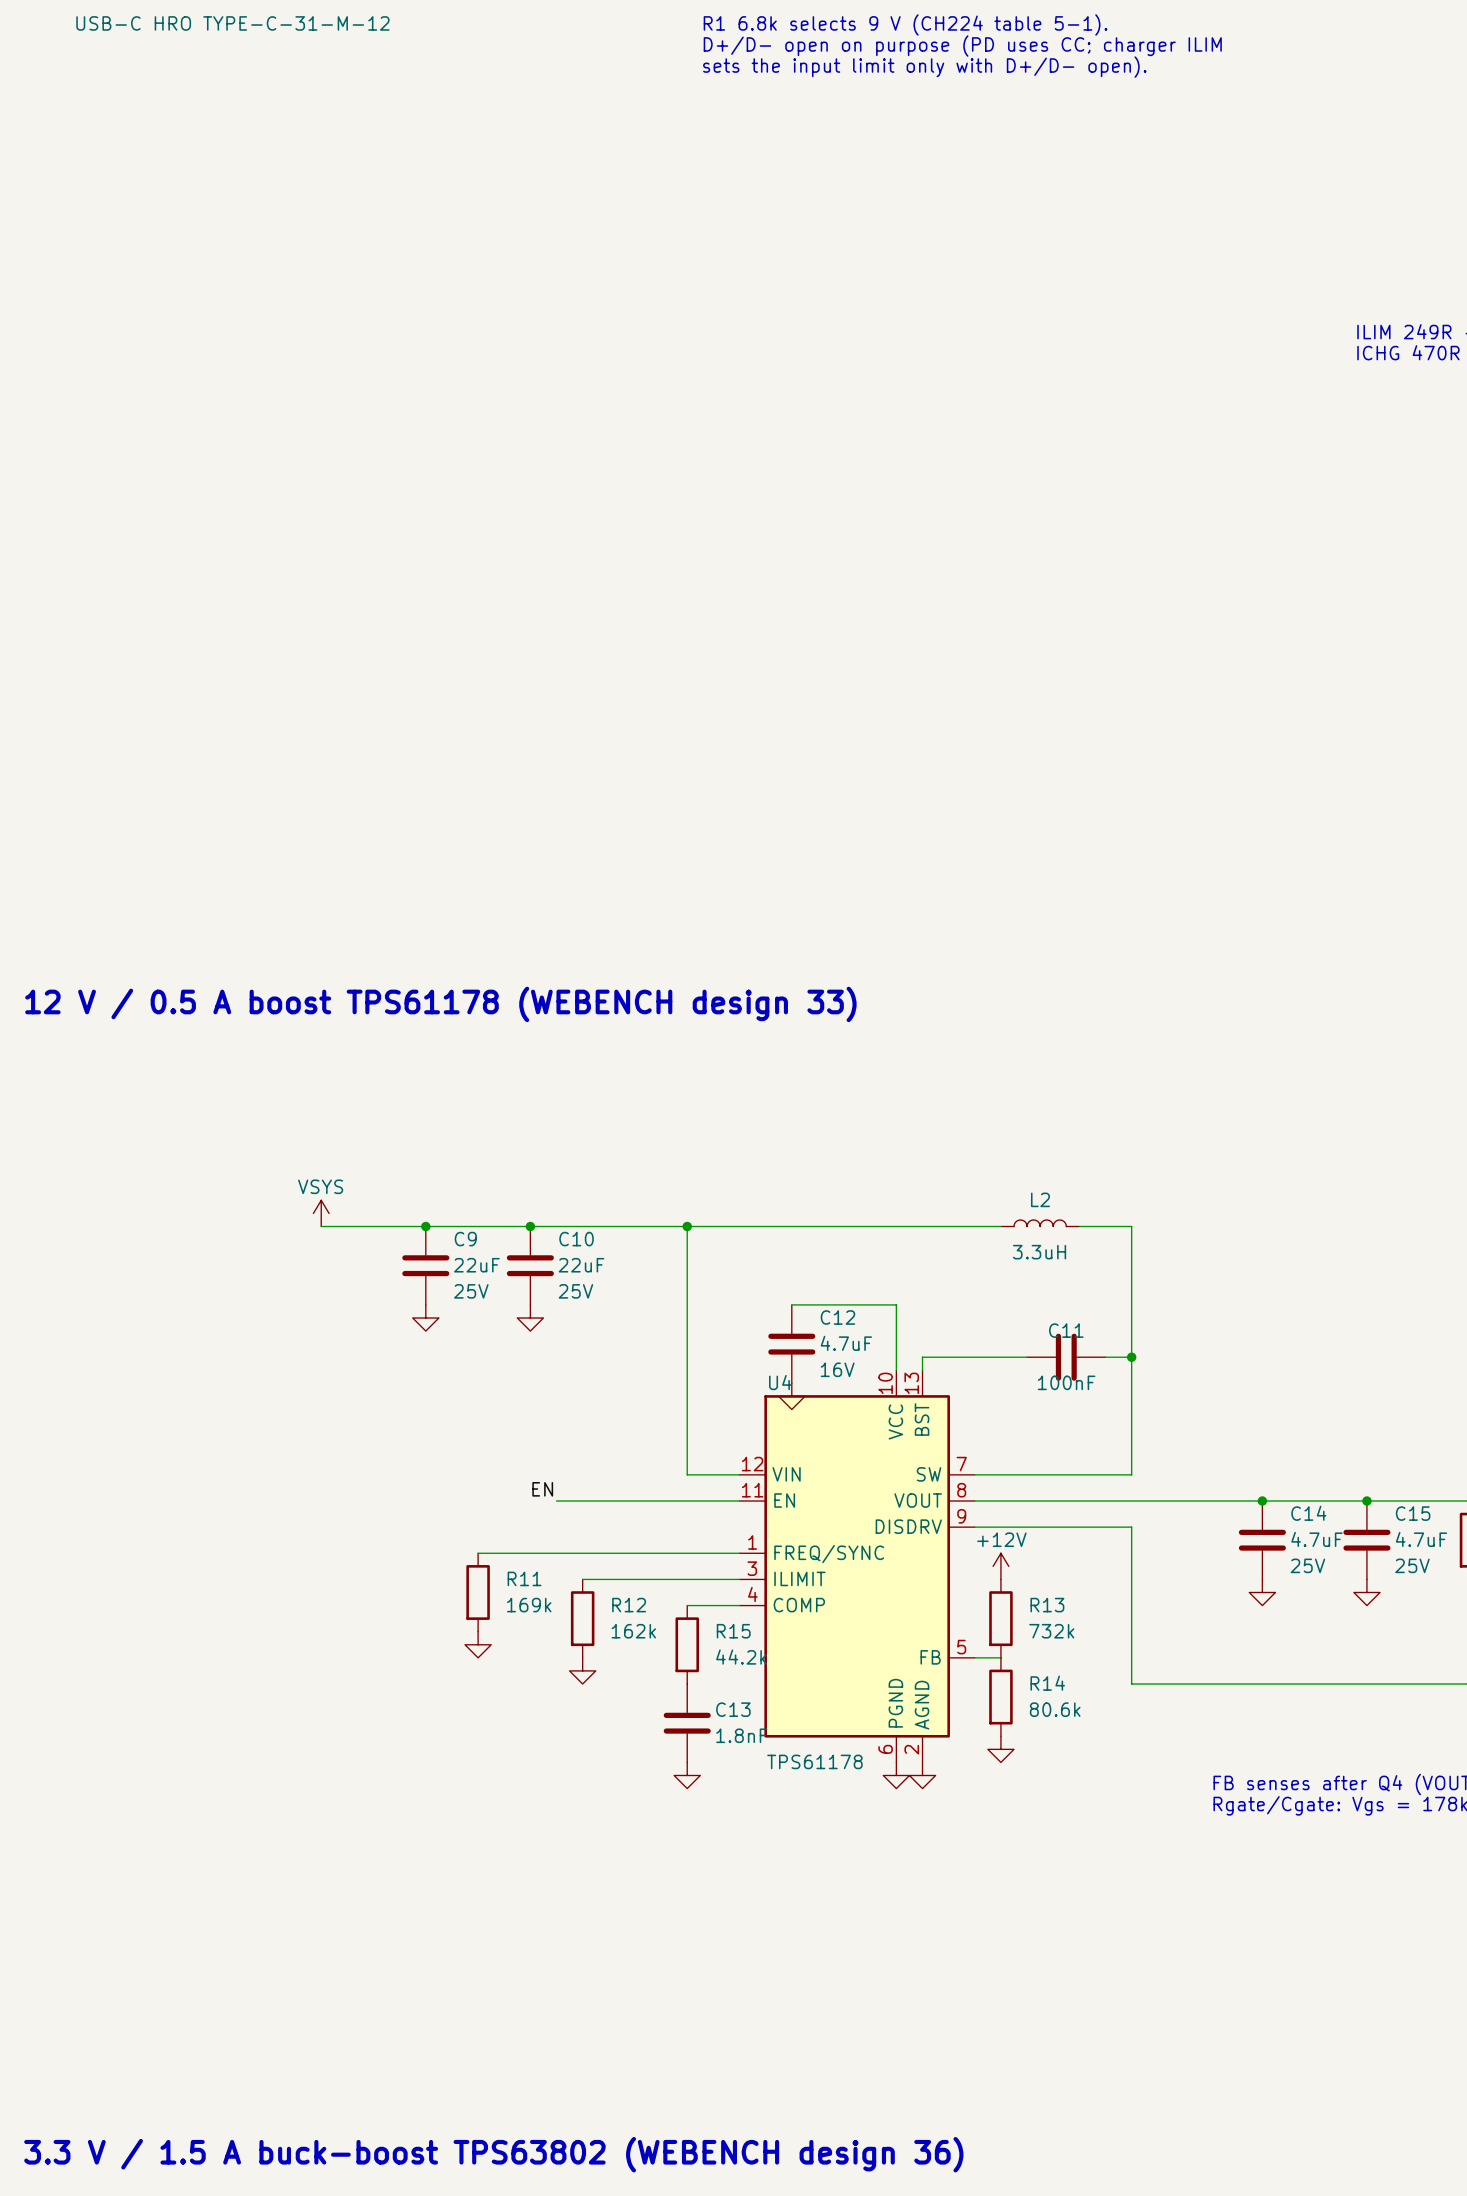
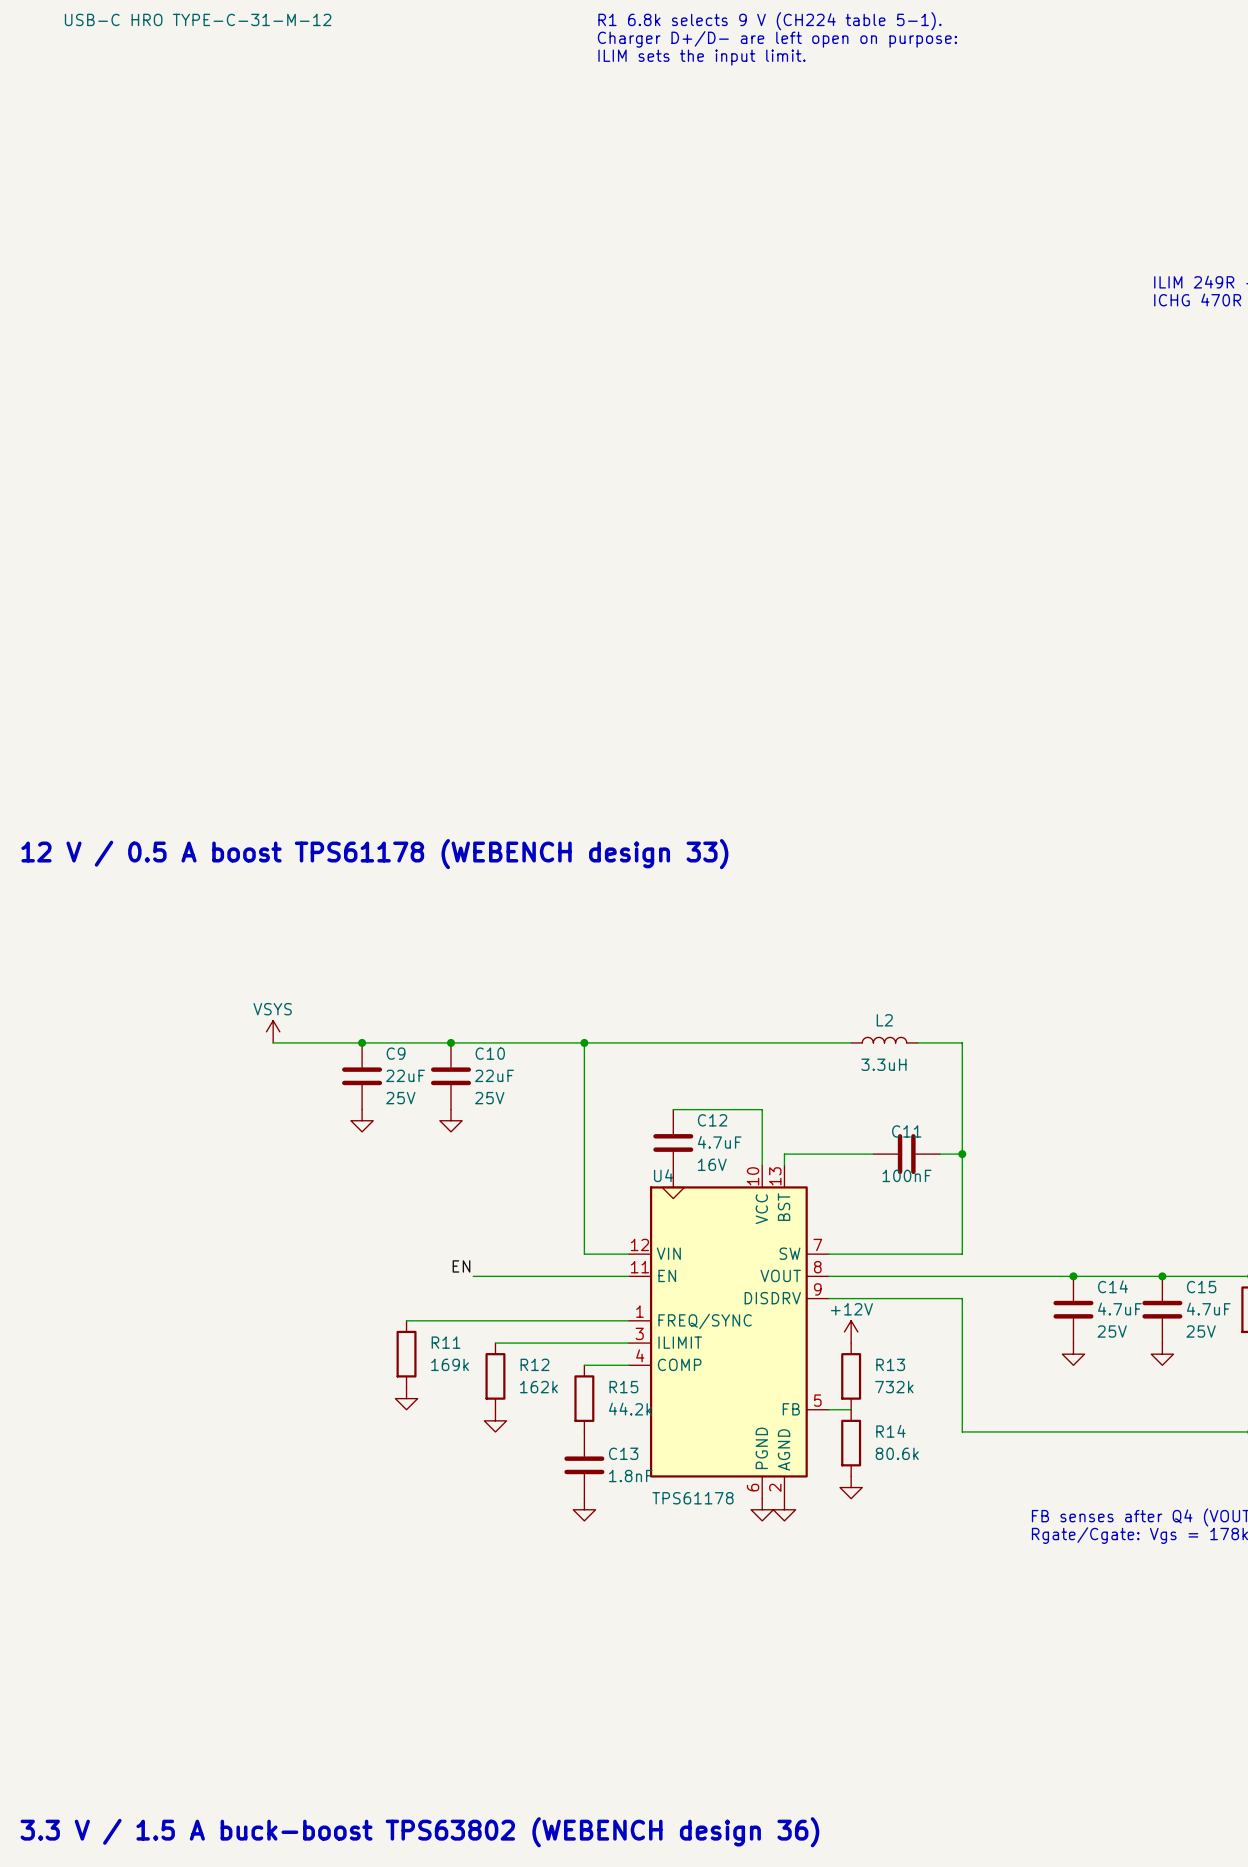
text: D+/D- open on purpose (PD uses CC; charger ILIM (962, 46) -> Charger D+/D- are left open on purpose: (777, 39)
text: sets the input limit only with D+/D- open). (924, 67) -> ILIM sets the input limit. (701, 57)

